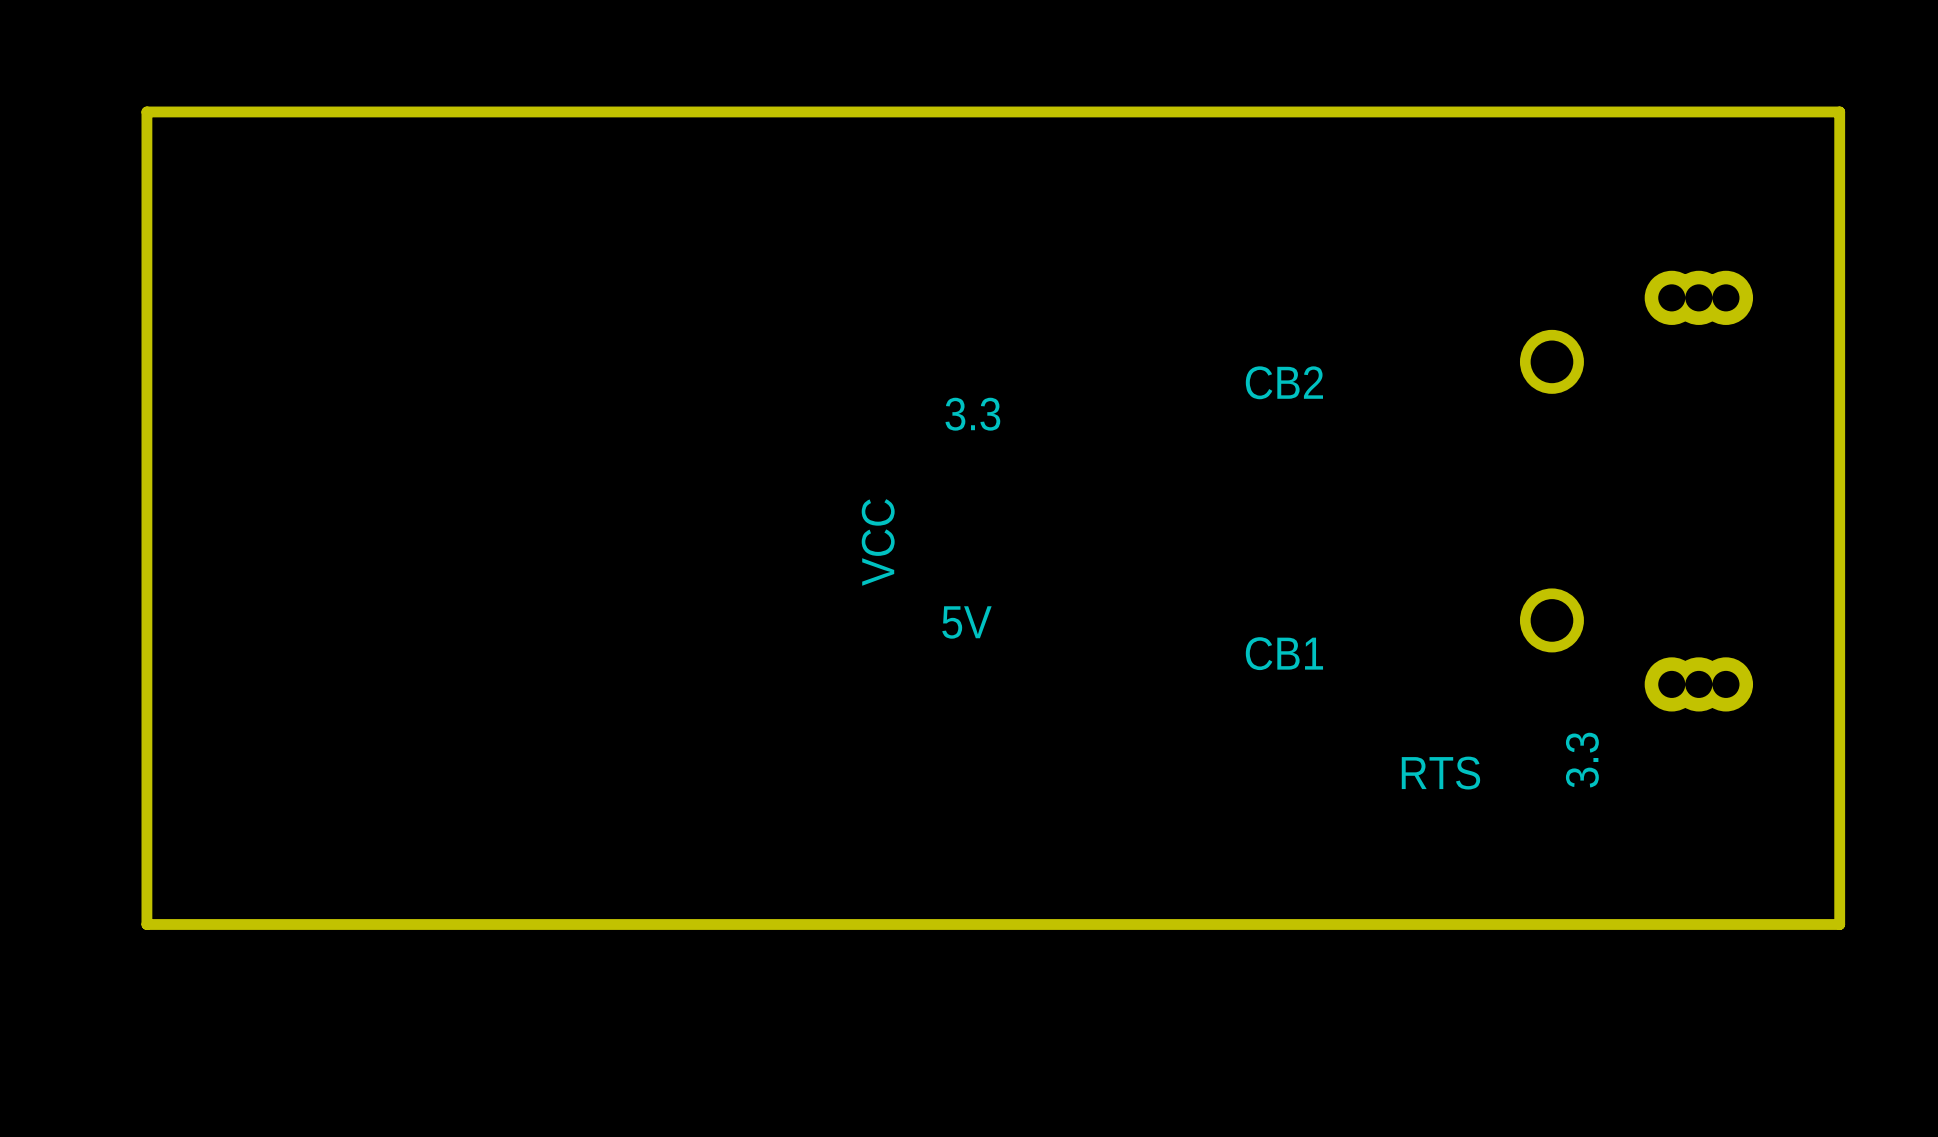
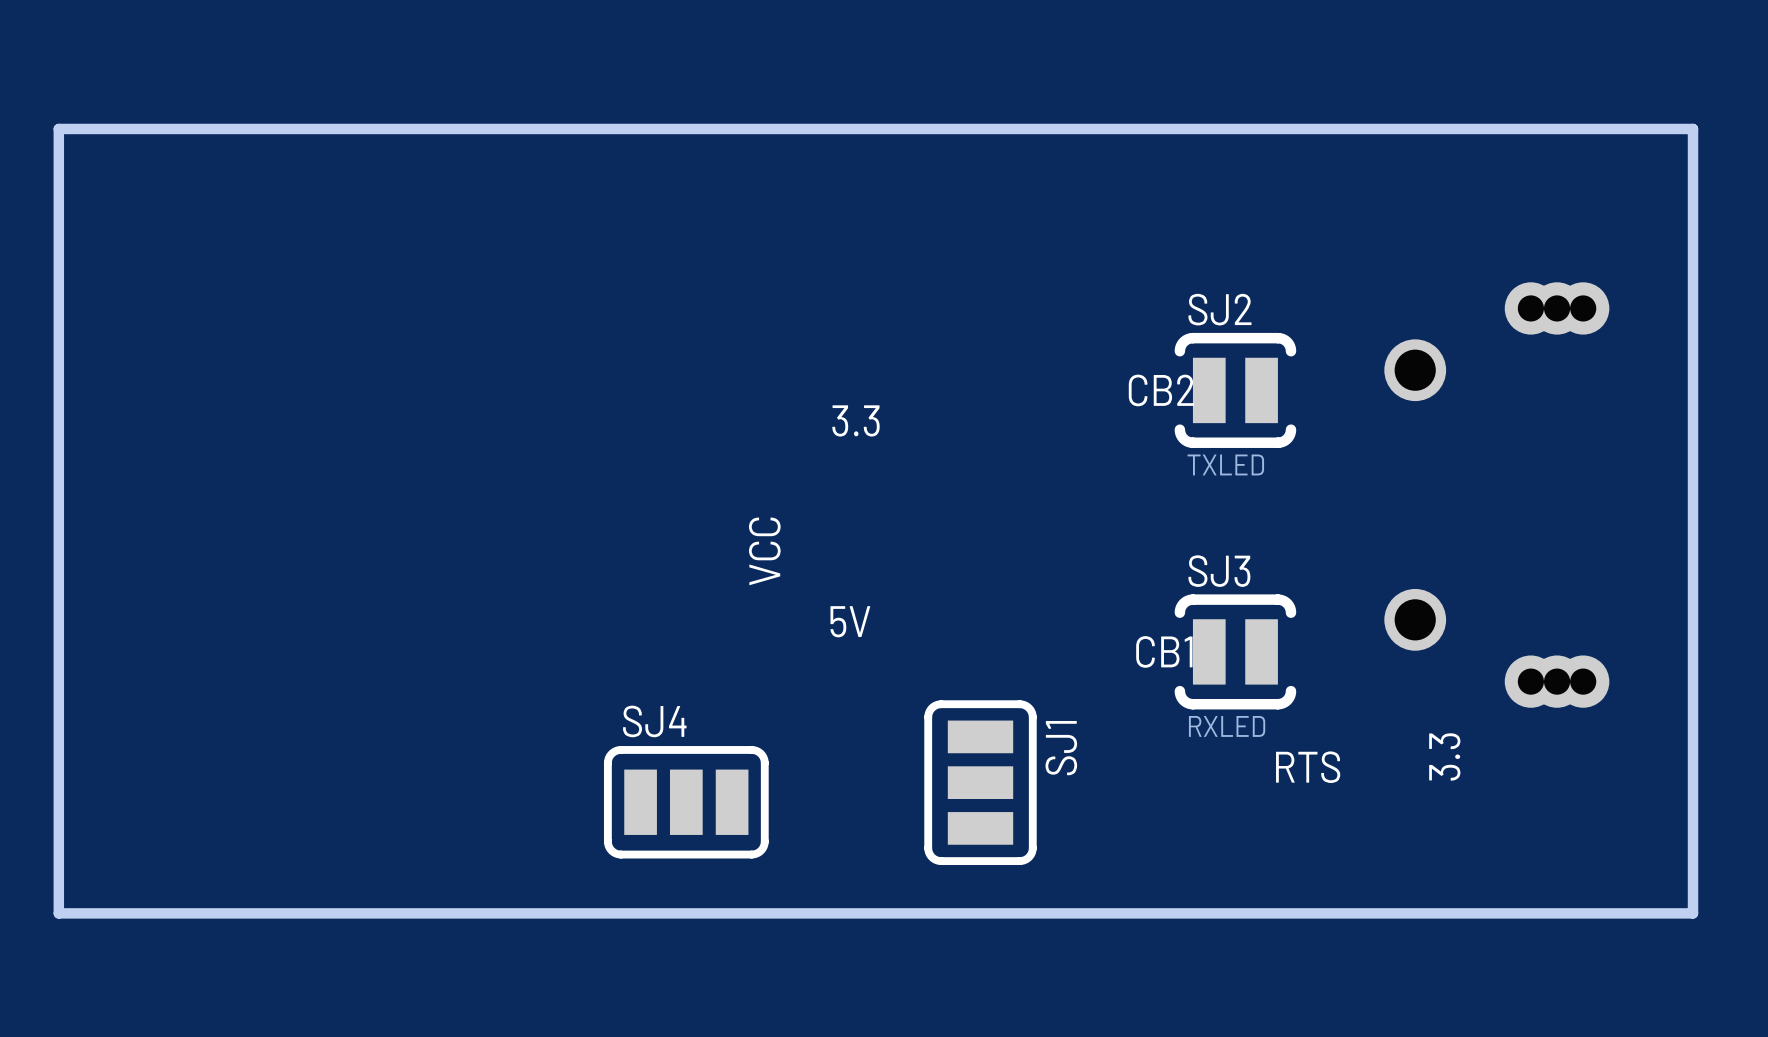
SJ2: none -> TXLED (1235, 390)
SJ3: none -> RXLED (1235, 651)
SJ1: none -> (980, 782)
SJ4: none -> (686, 802)

